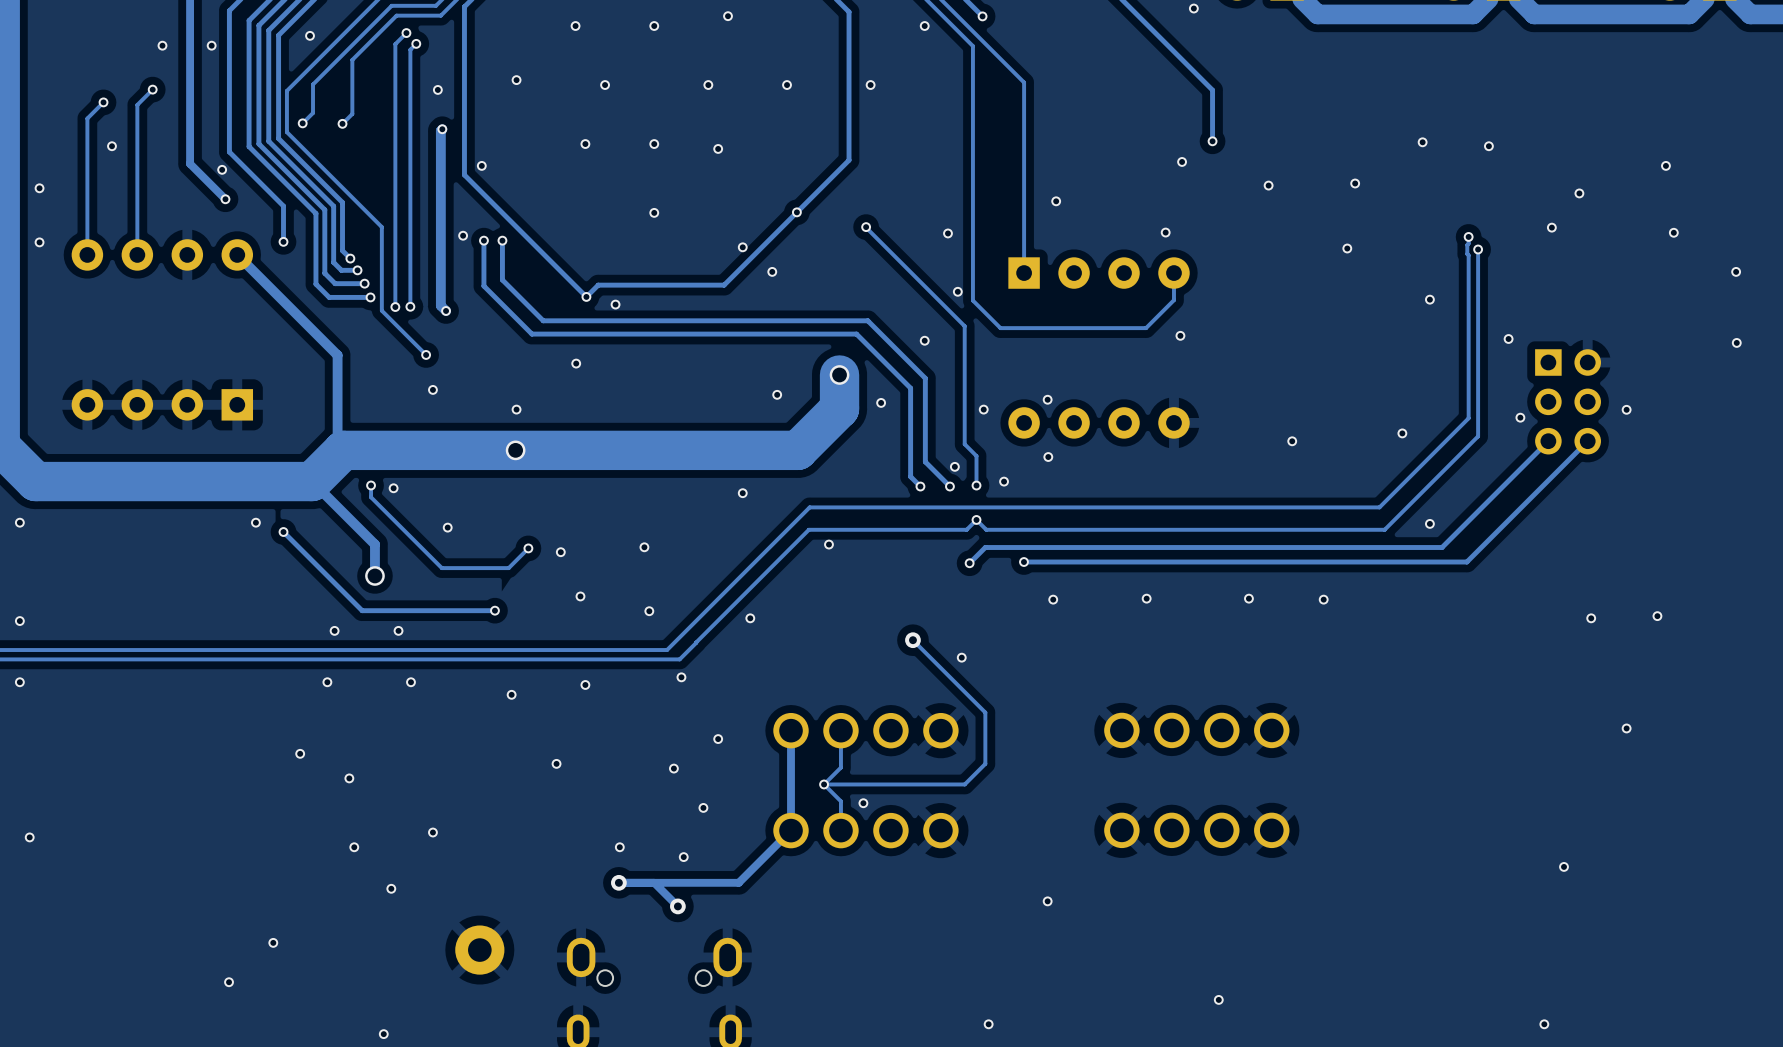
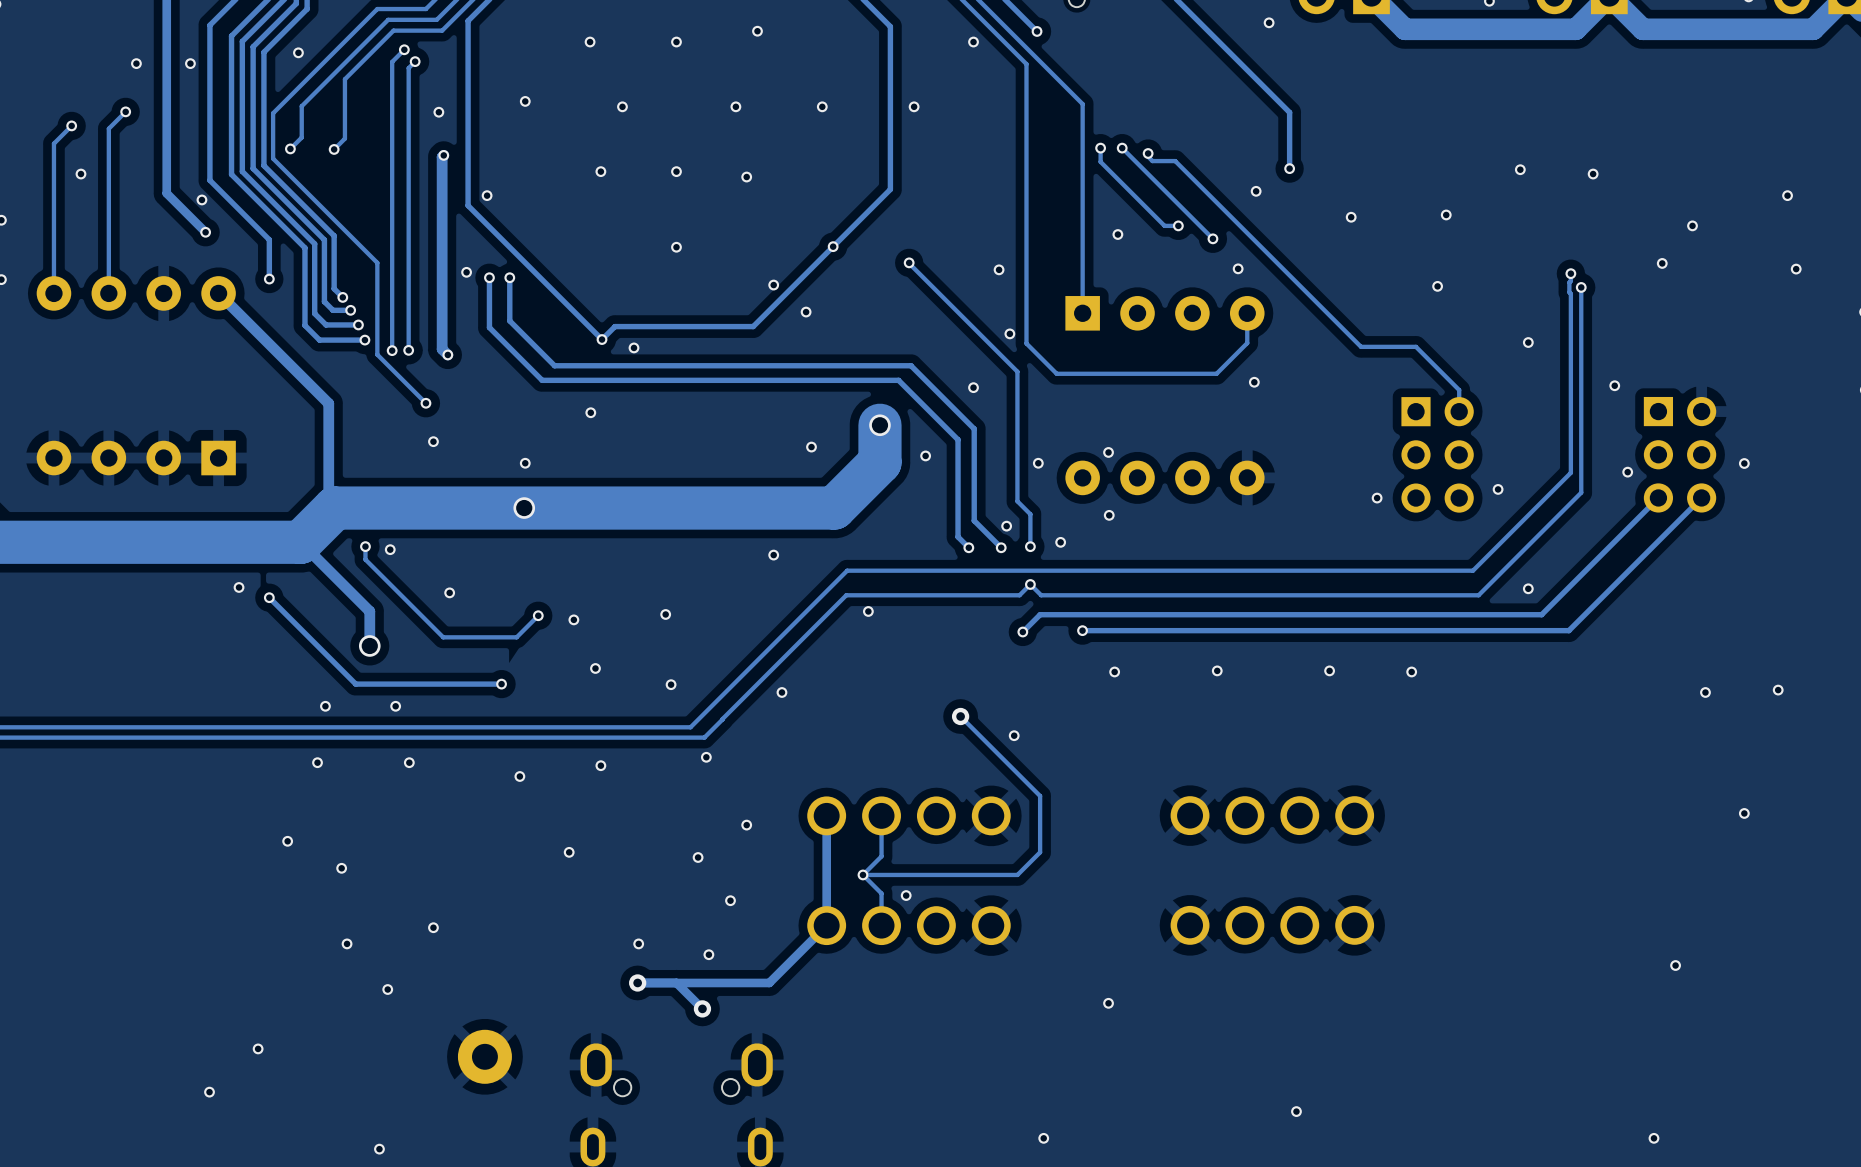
track: none -> (1100, 148) (1100, 161) (1164, 225) (1178, 225)
via: none -> (1100, 148)
track: none -> (1122, 148) (1212, 238)
via: none -> (1122, 148)
track: none -> (1148, 153) (1148, 156) (1152, 161) (1175, 161) (1361, 346) (1416, 346) (1459, 390) (1459, 411)
via: none -> (1148, 153)
via: none -> (1178, 225)
via: none -> (1212, 238)
part: none -> (1437, 454)

